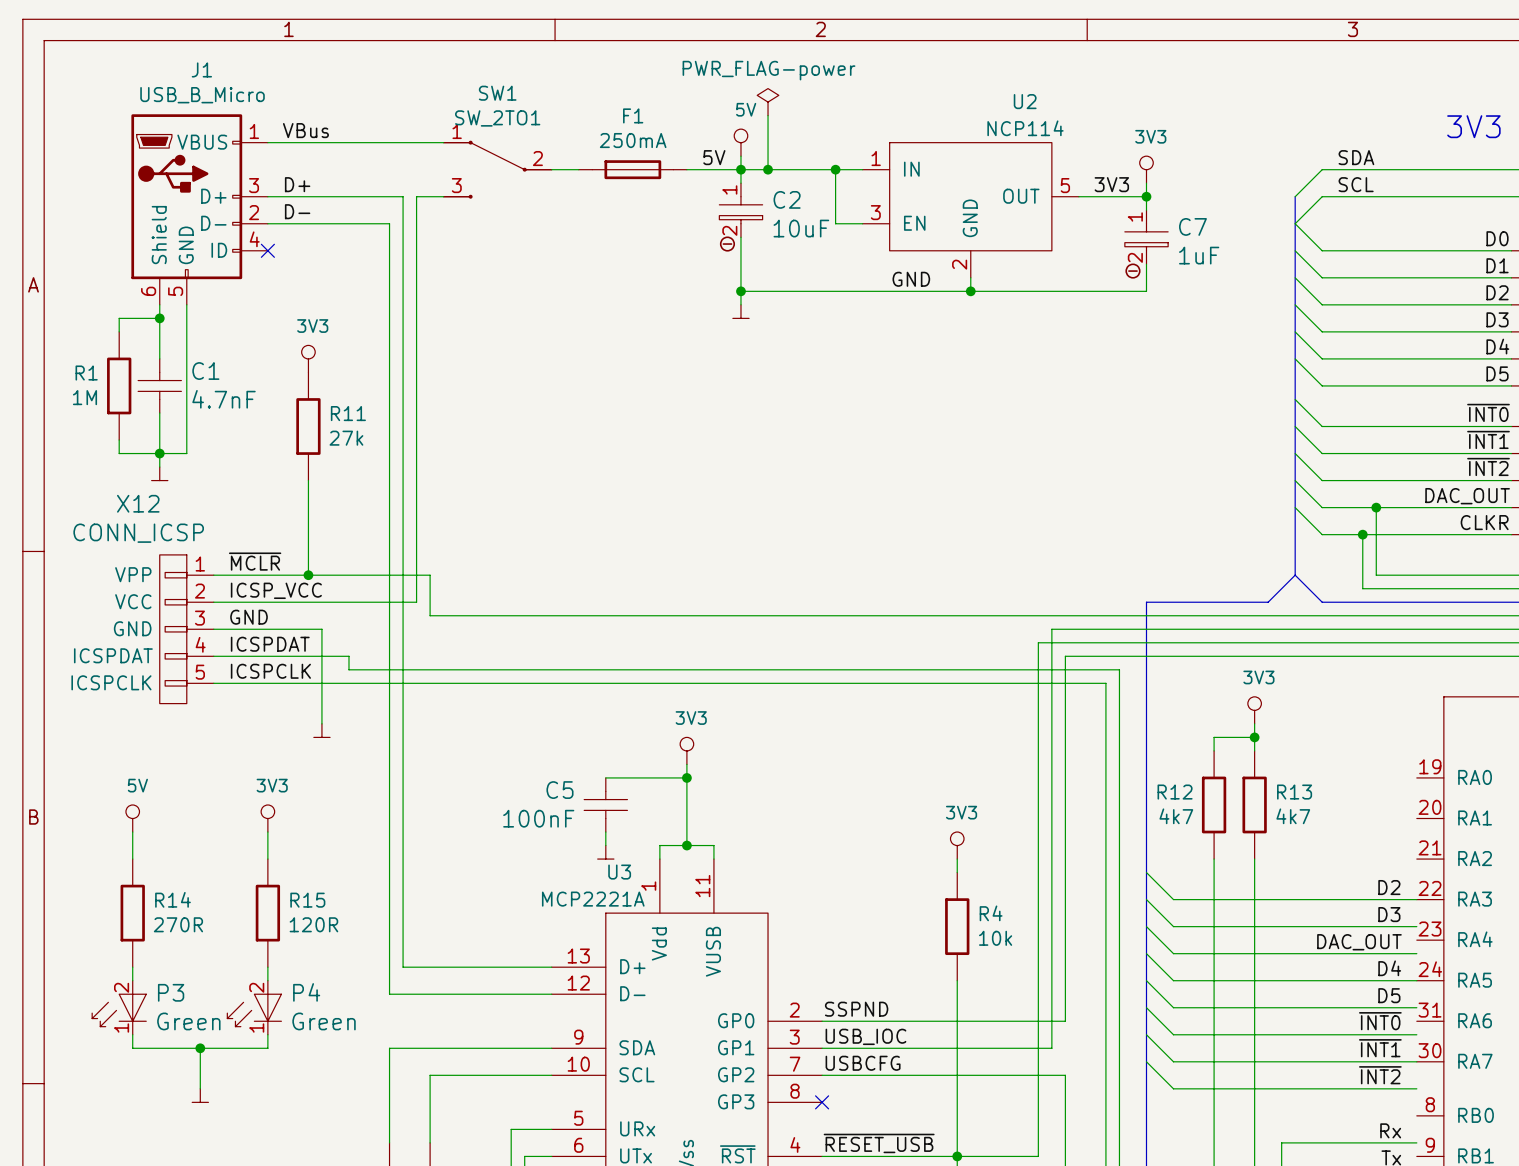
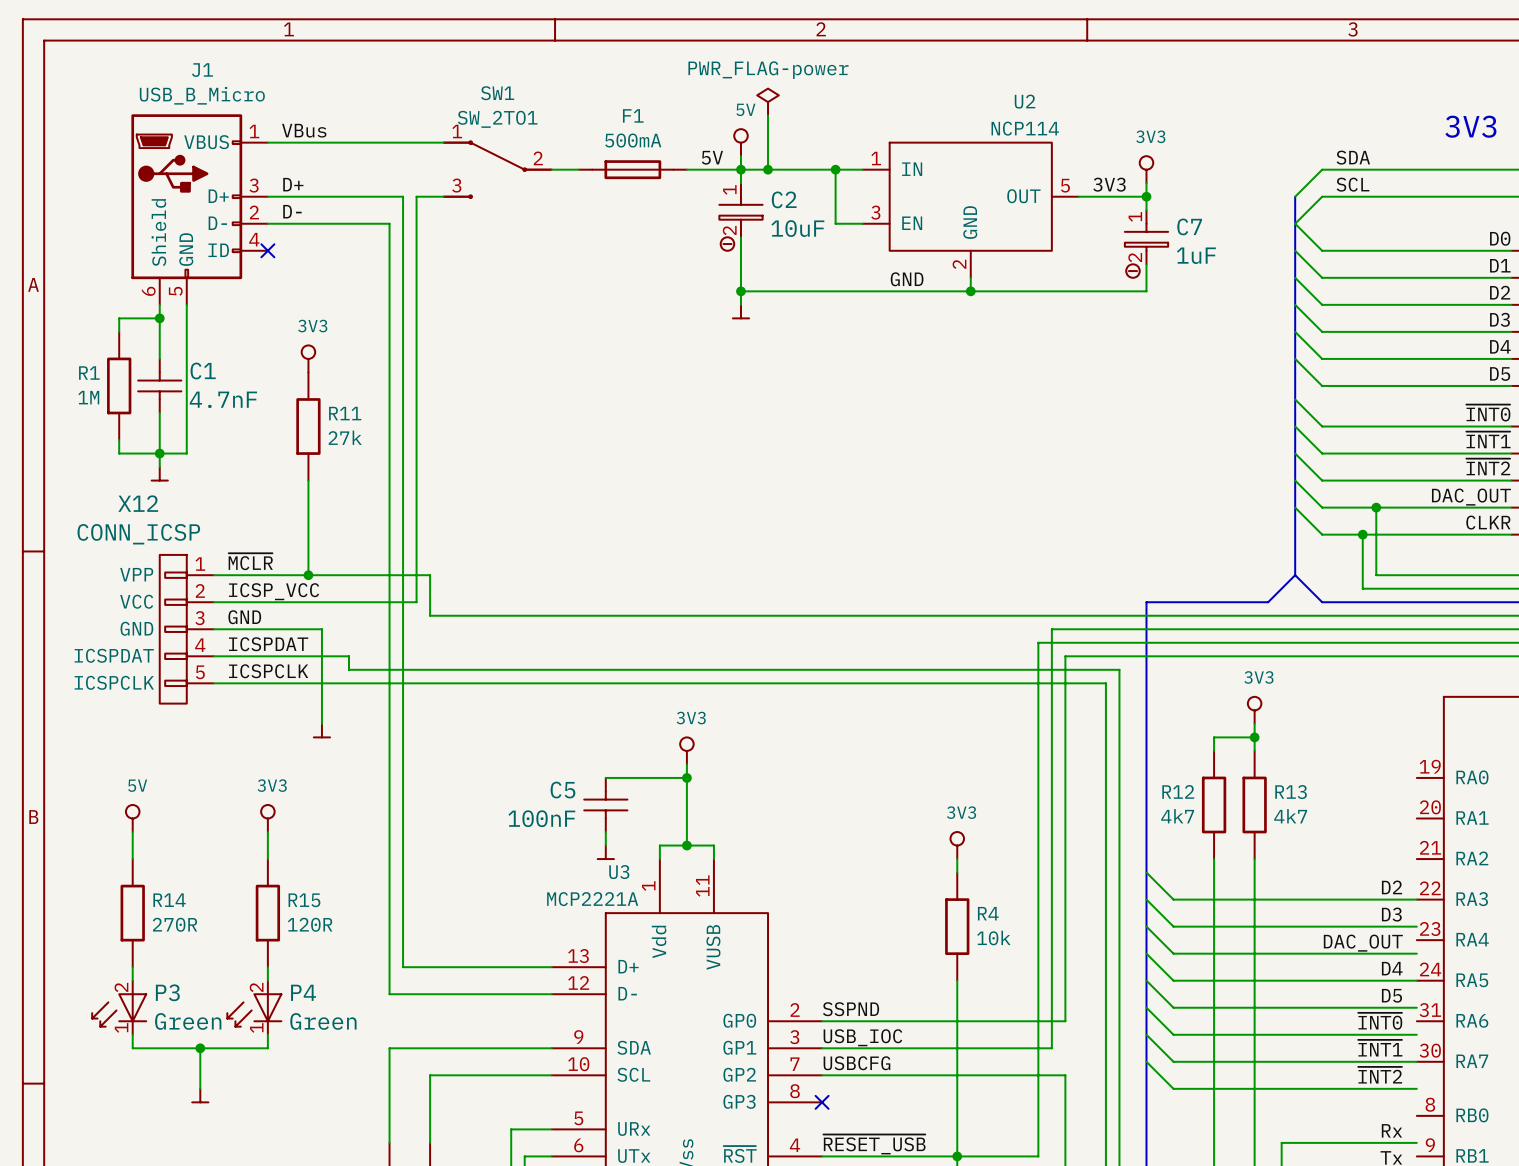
F1 value: 250mA (633, 140) -> 500mA (633, 140)

